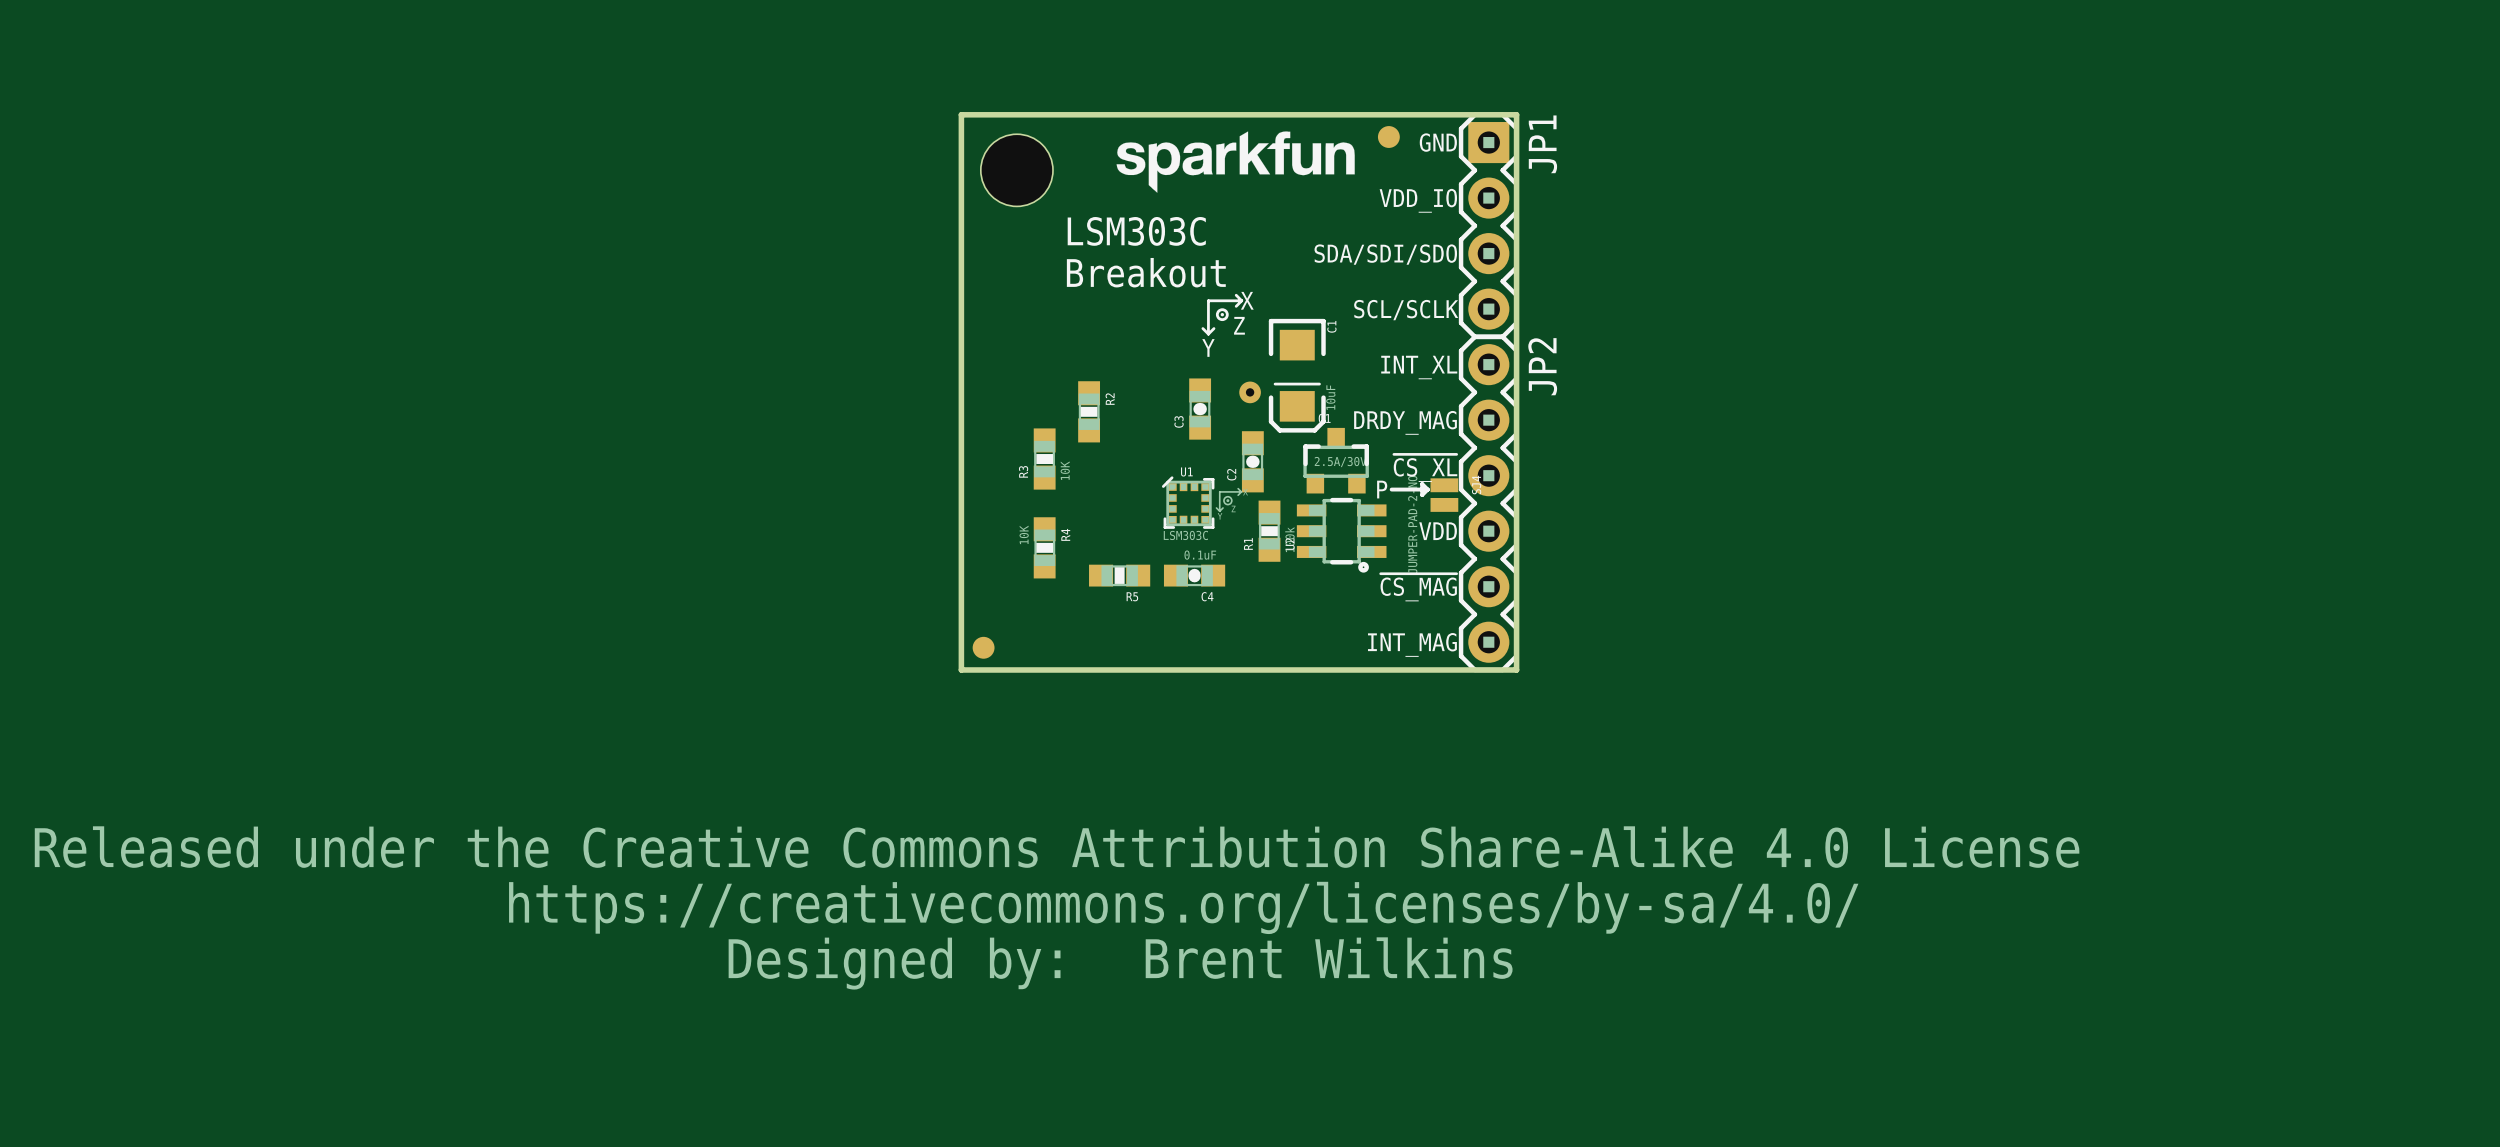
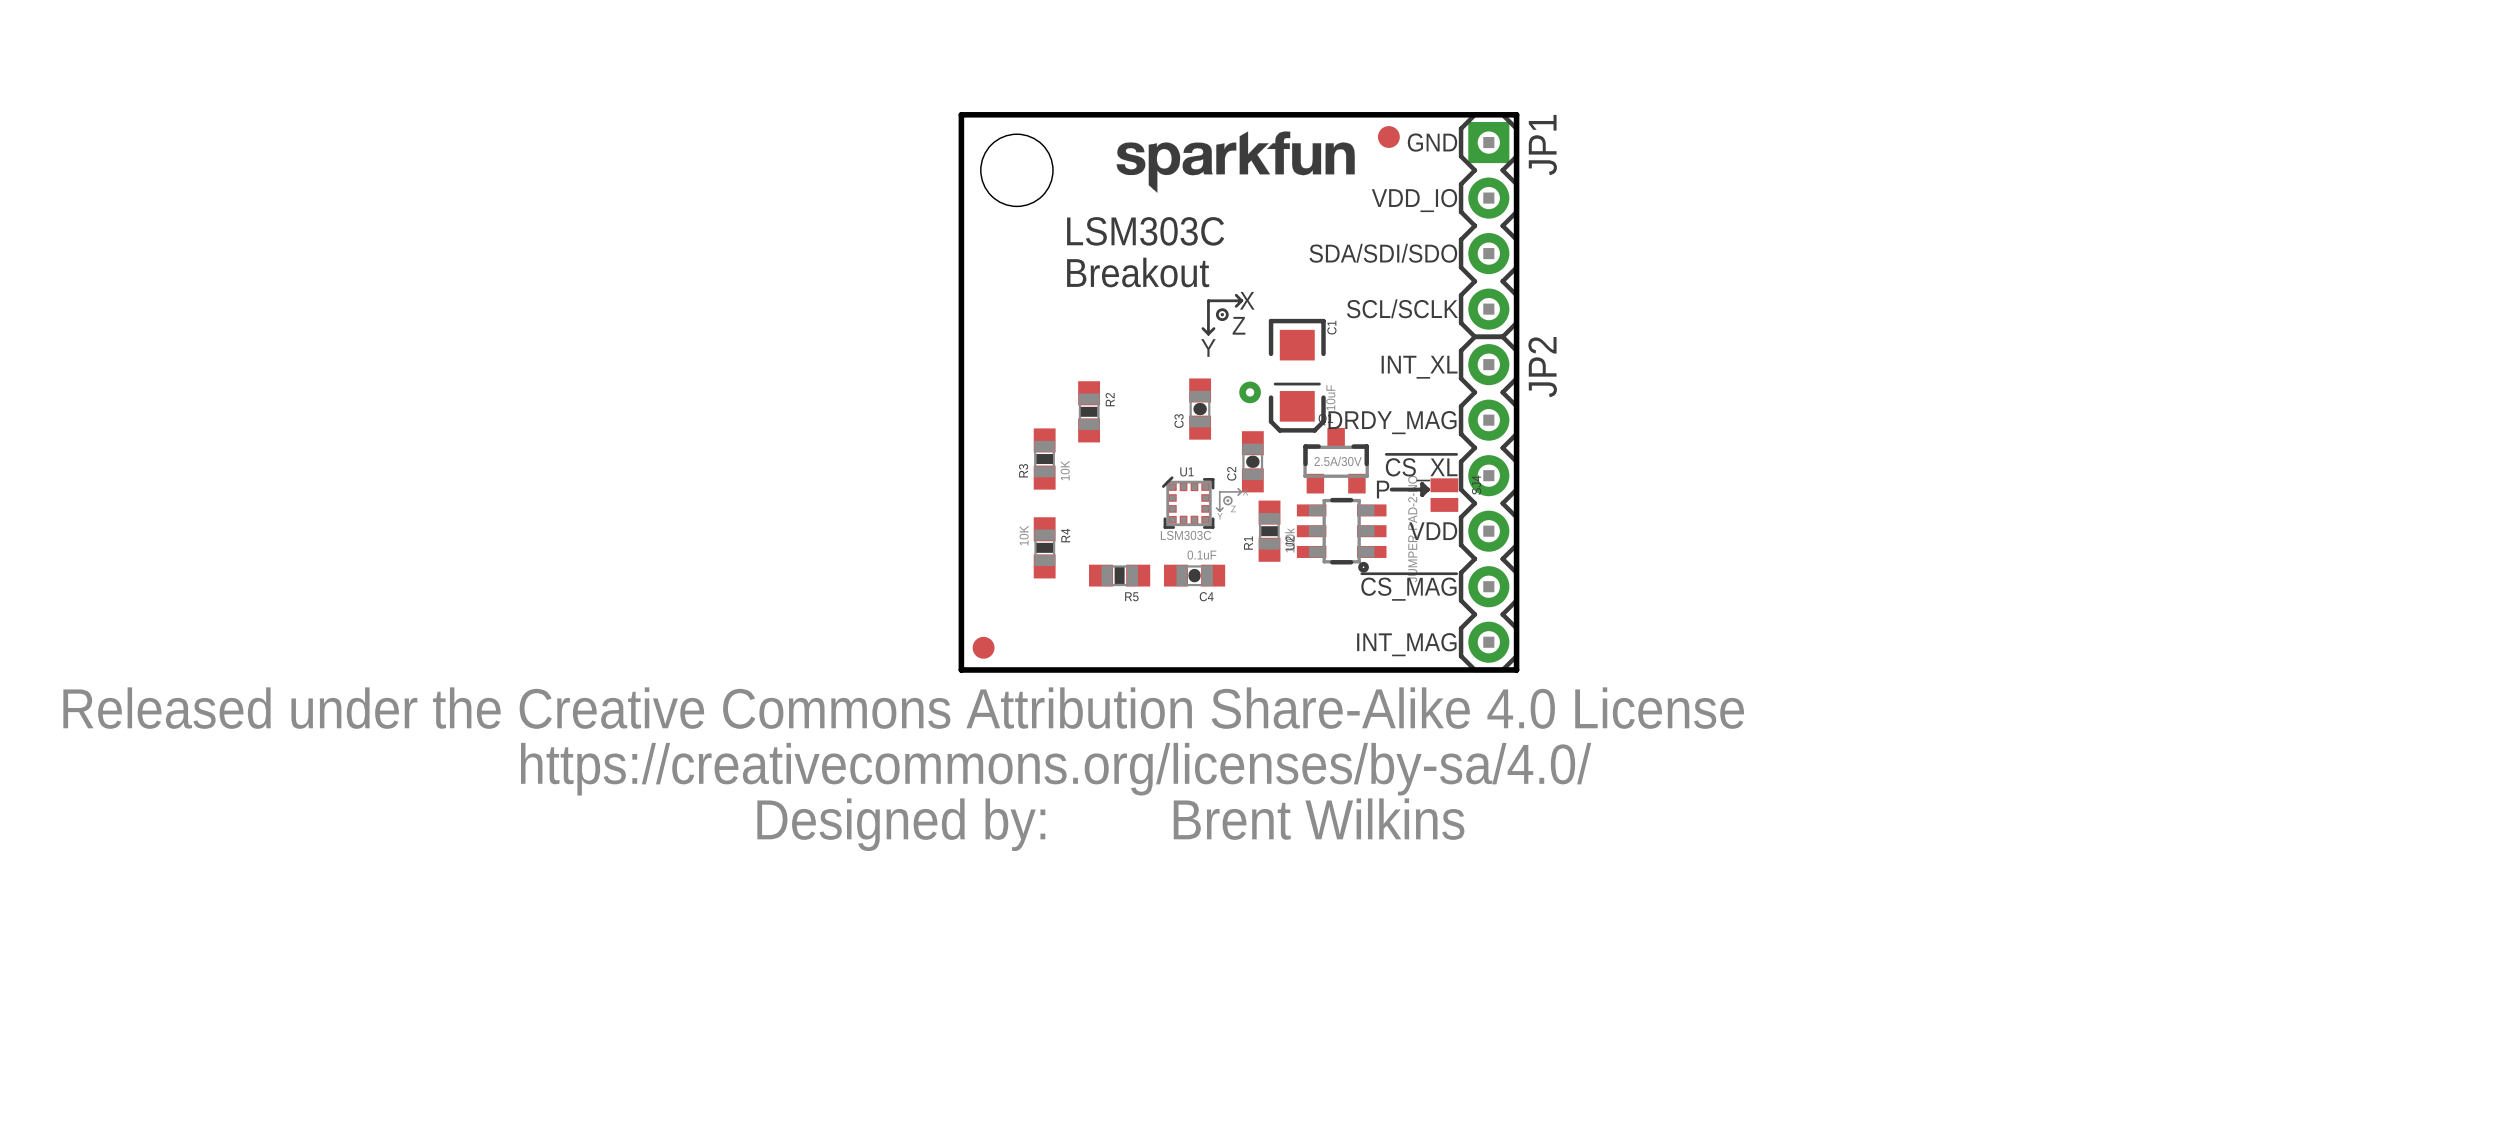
drawing position: (1057, 907) -> (903, 769)

